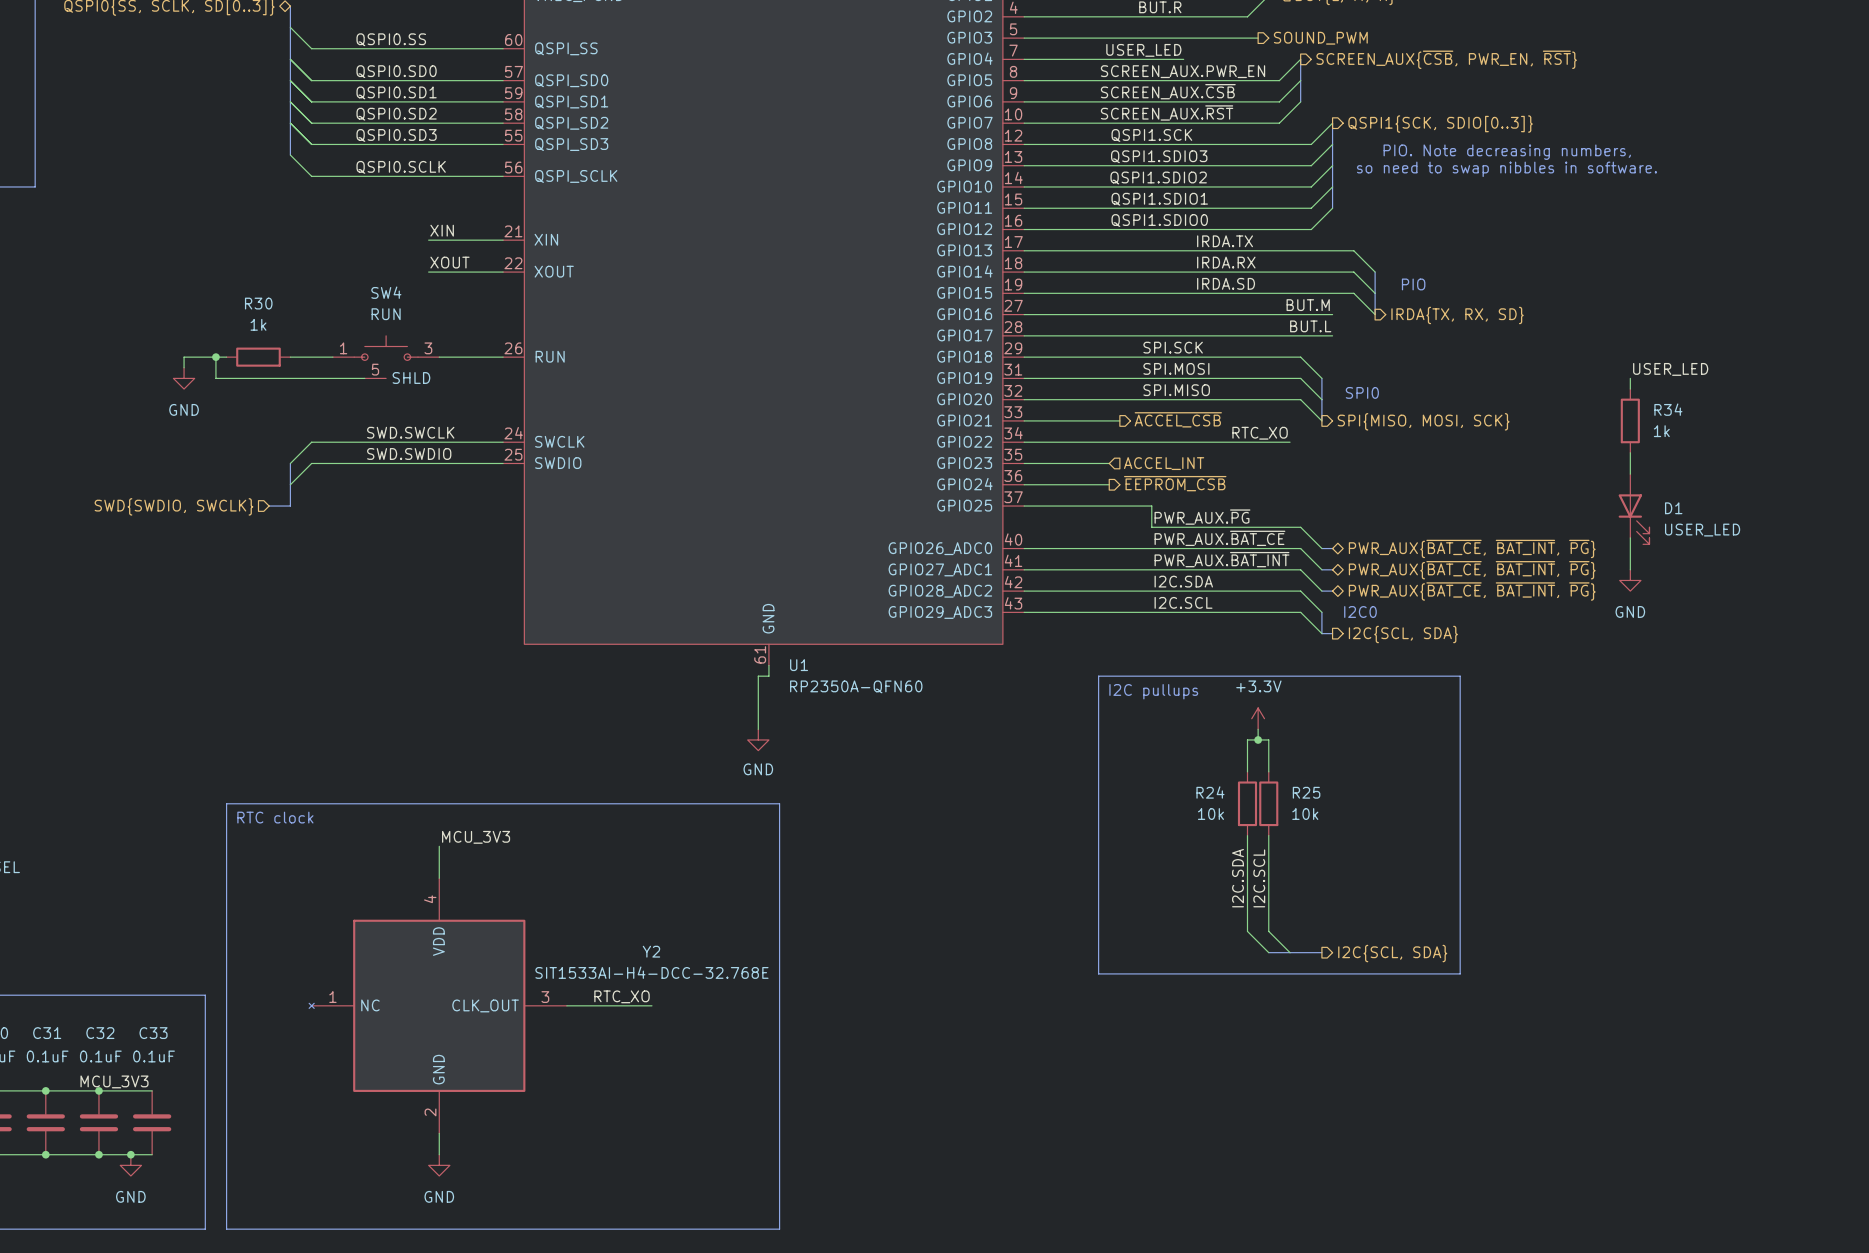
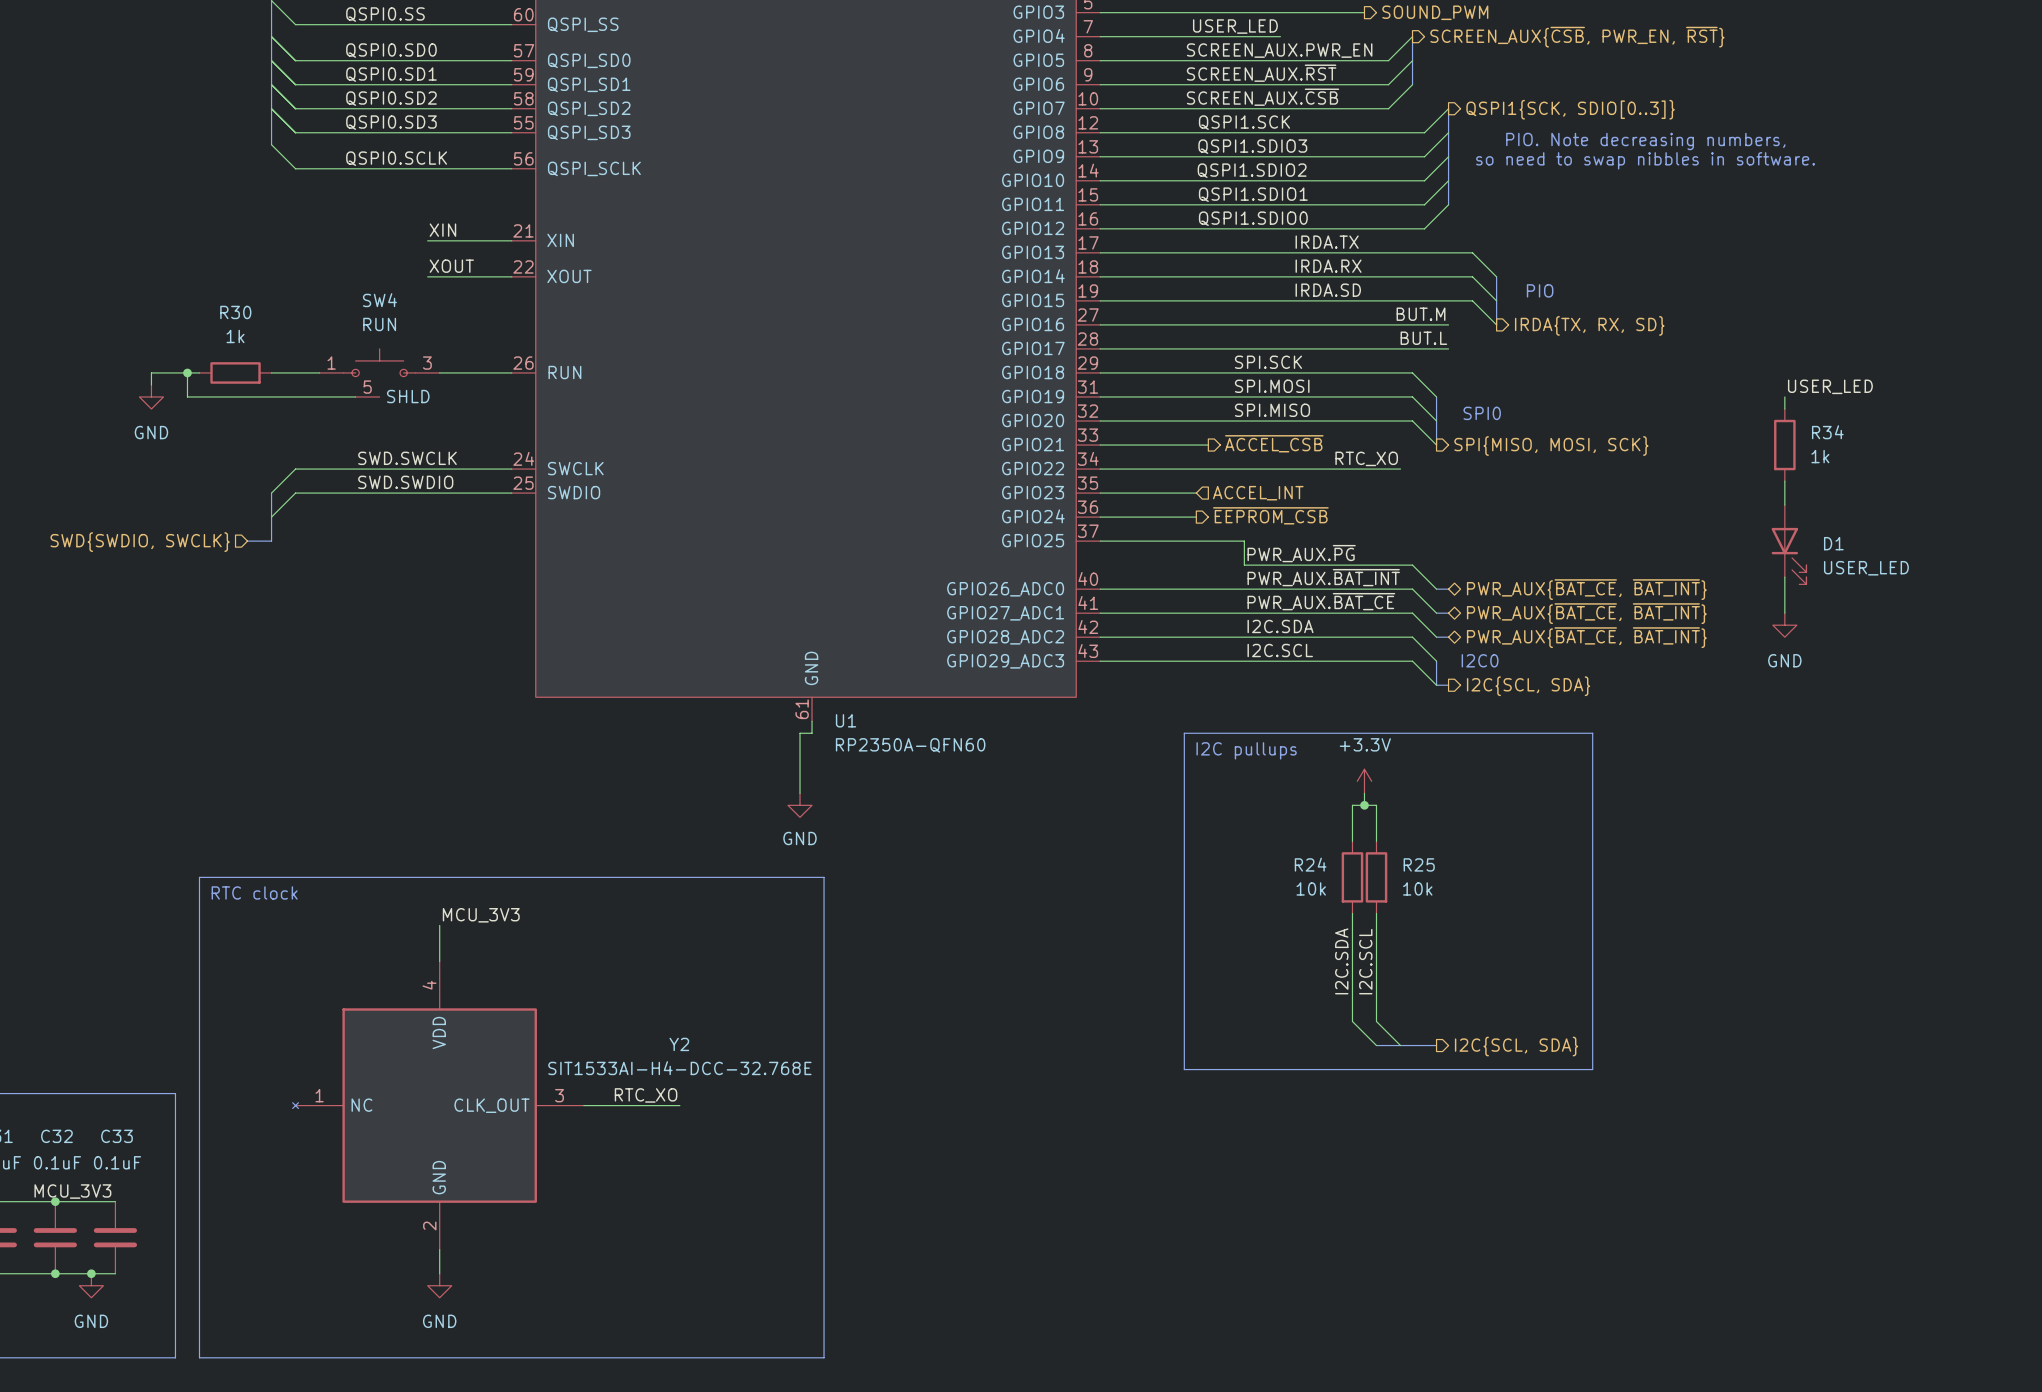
label: SCREEN_AUX.~{CSB} (1168, 91) -> SCREEN_AUX.~{RST} (1261, 73)
label: SCREEN_AUX.~{RST} (1167, 112) -> SCREEN_AUX.~{CSB} (1263, 97)
label: PWR_AUX.~{BAT_CE} (1219, 538) -> PWR_AUX.~{BAT_INT} (1323, 577)
hierarchical label: PWR_AUX{~{BAT_CE}, ~{BAT_INT}, ~{PG}} (1472, 548) -> PWR_AUX{~{BAT_CE}, ~{BAT_INT}} (1586, 589)
label: PWR_AUX.~{BAT_INT} (1222, 559) -> PWR_AUX.~{BAT_CE} (1321, 601)
hierarchical label: PWR_AUX{~{BAT_CE}, ~{BAT_INT}, ~{PG}} (1472, 570) -> PWR_AUX{~{BAT_CE}, ~{BAT_INT}} (1586, 613)
hierarchical label: PWR_AUX{~{BAT_CE}, ~{BAT_INT}, ~{PG}} (1472, 591) -> PWR_AUX{~{BAT_CE}, ~{BAT_INT}} (1586, 637)

